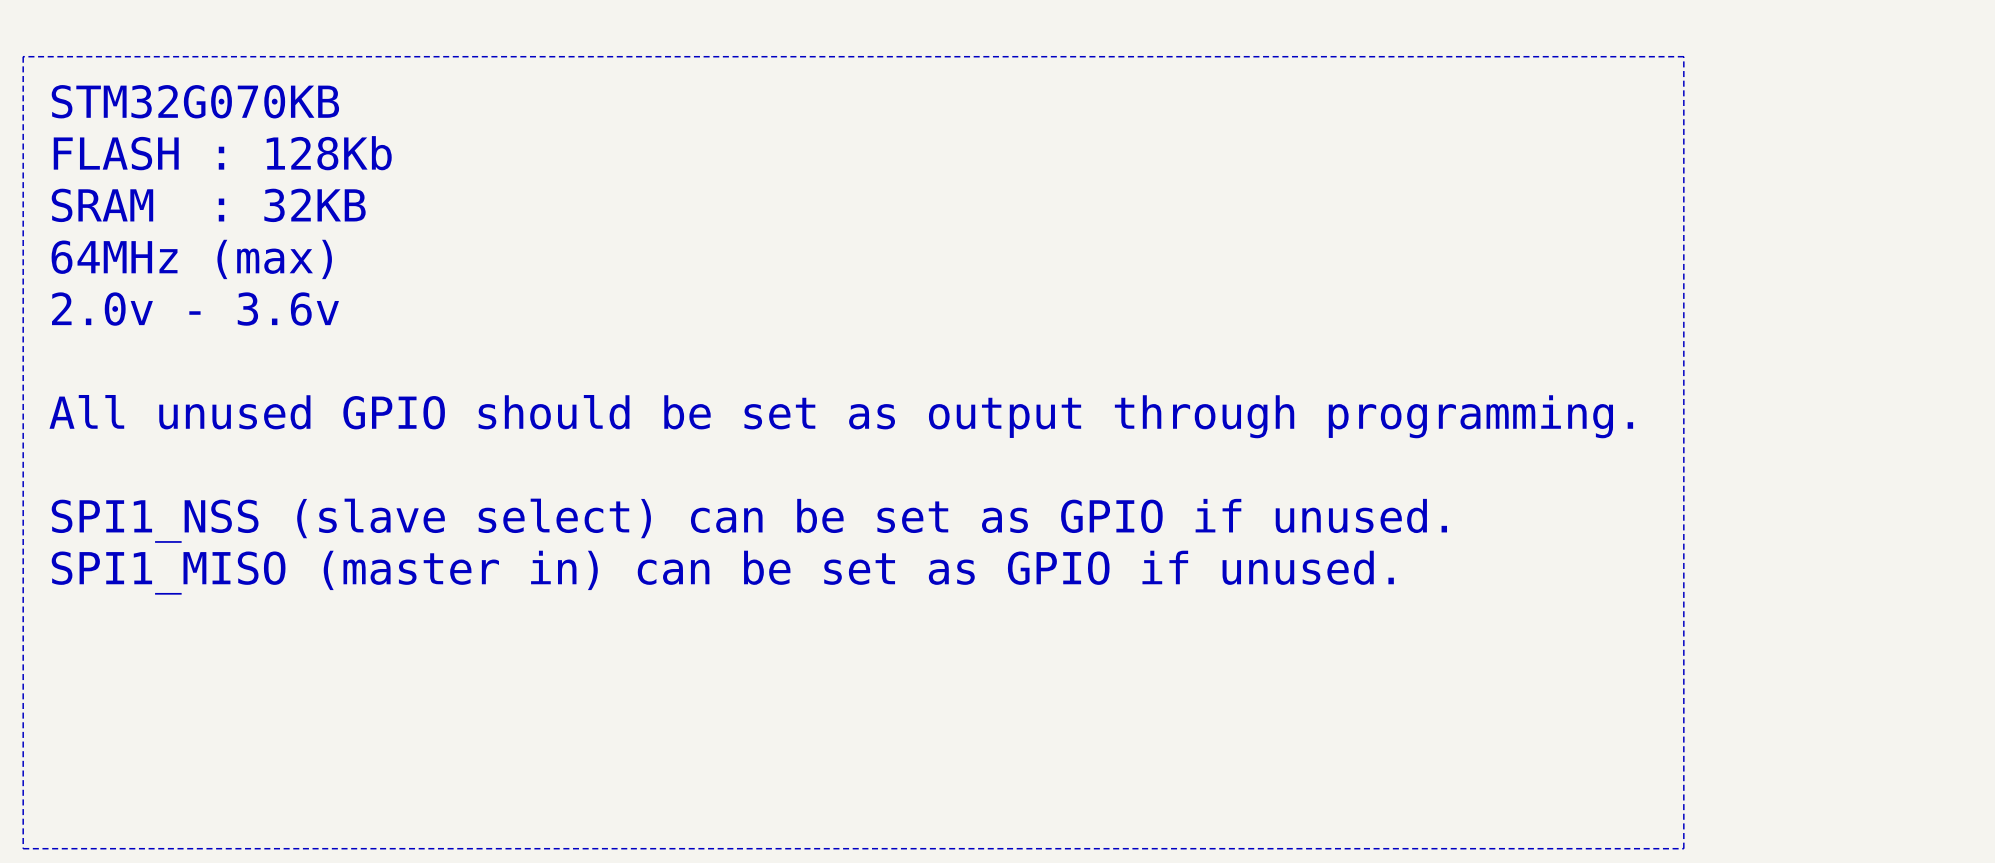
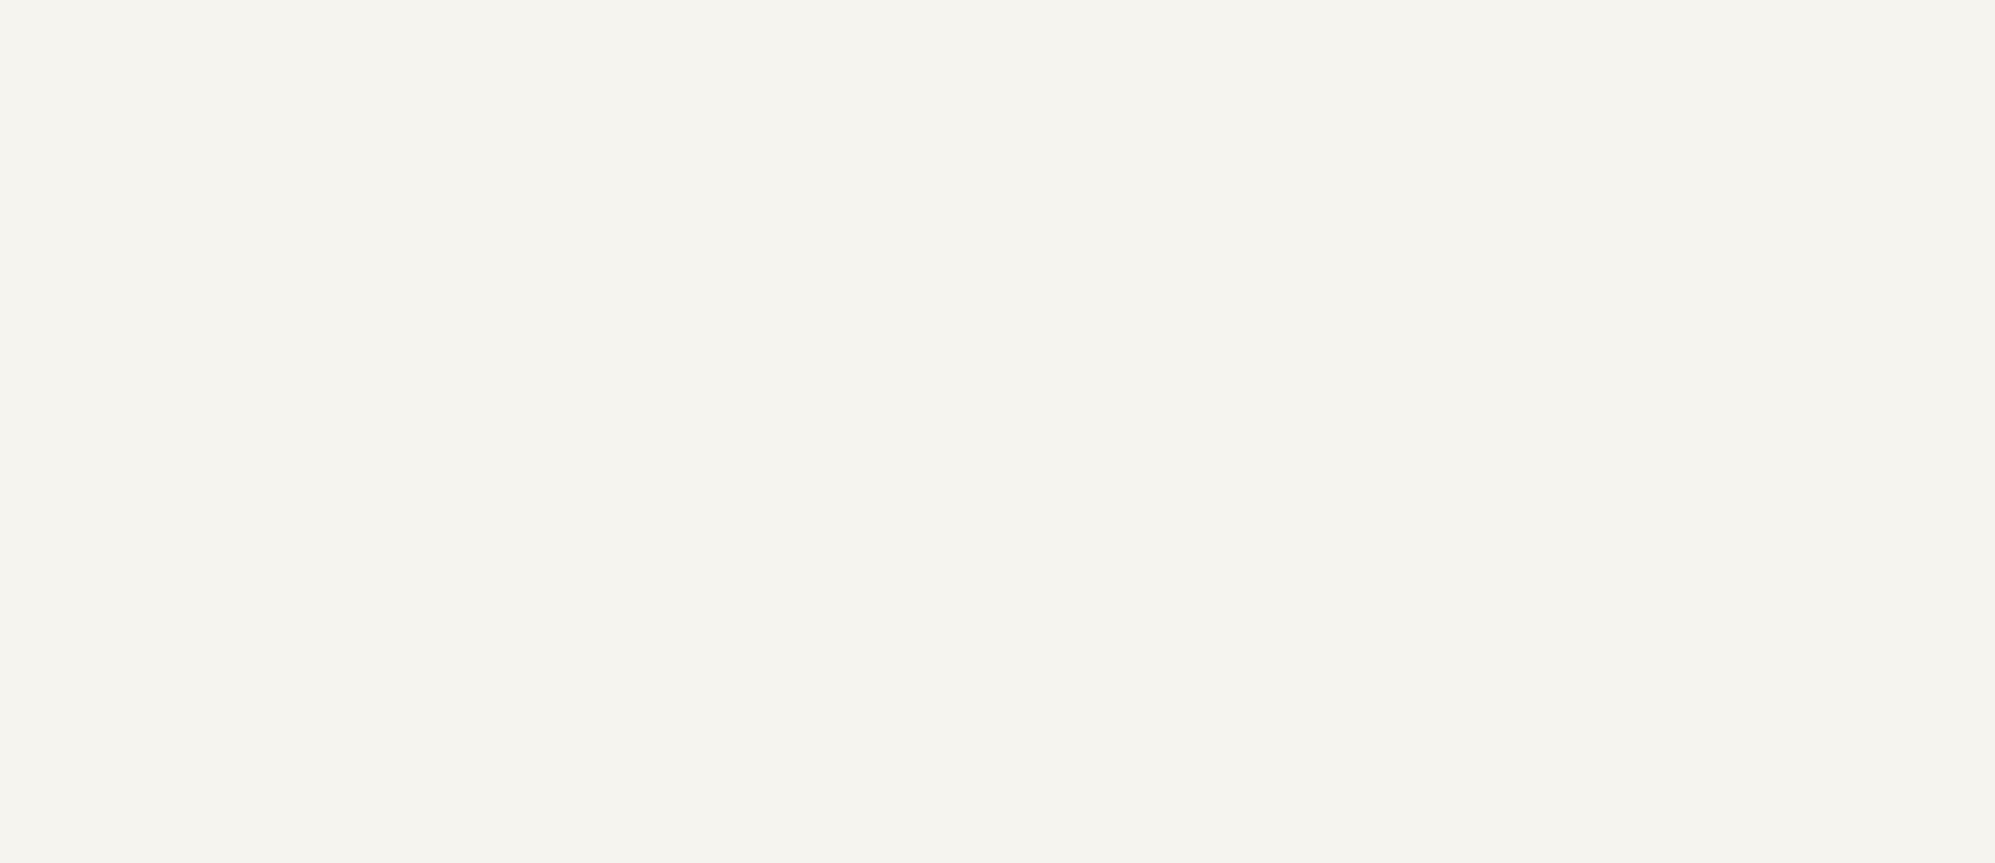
line: (23, 56) (23, 848) (1683, 848) (1683, 56) (23, 56) -> none
text: STM32G070KB (195, 101) -> none
text: FLASH : 128Kb (222, 153) -> none
text: SRAM : 32KB (208, 205) -> none
text: 64MHz (max) (191, 259) -> none
text: 2.0v - 3.6v (195, 309) -> none
text: All unused GPIO should be set as output through programming. (841, 416) -> none
text: SPI1_NSS (slave select) can be set as GPIO if unused. (749, 520) -> none
text: SPI1_MISO (master in) can be set as GPIO if unused. (722, 572) -> none

